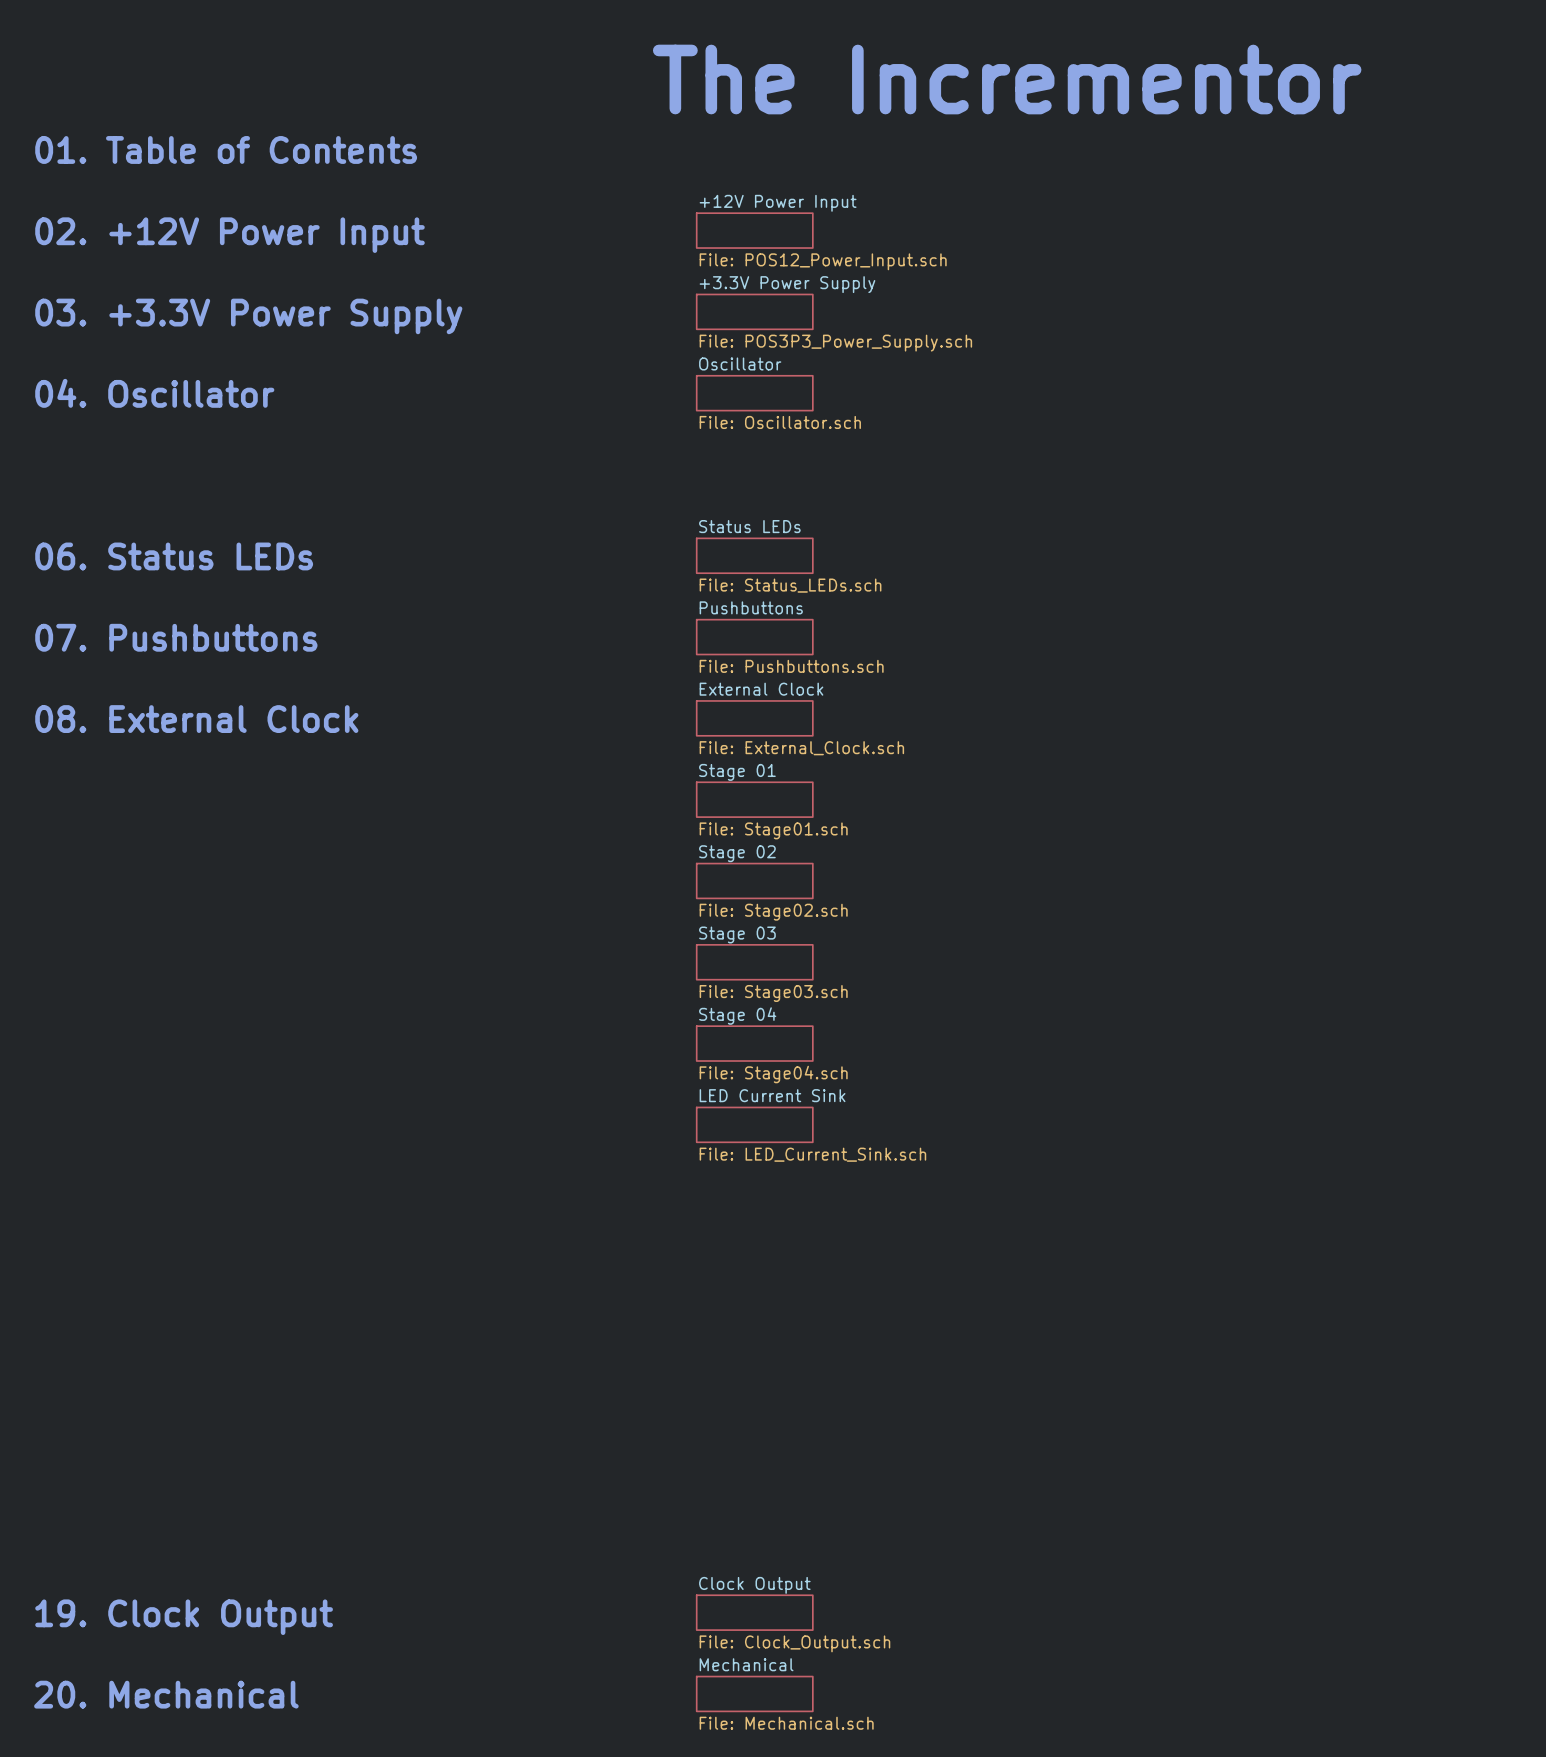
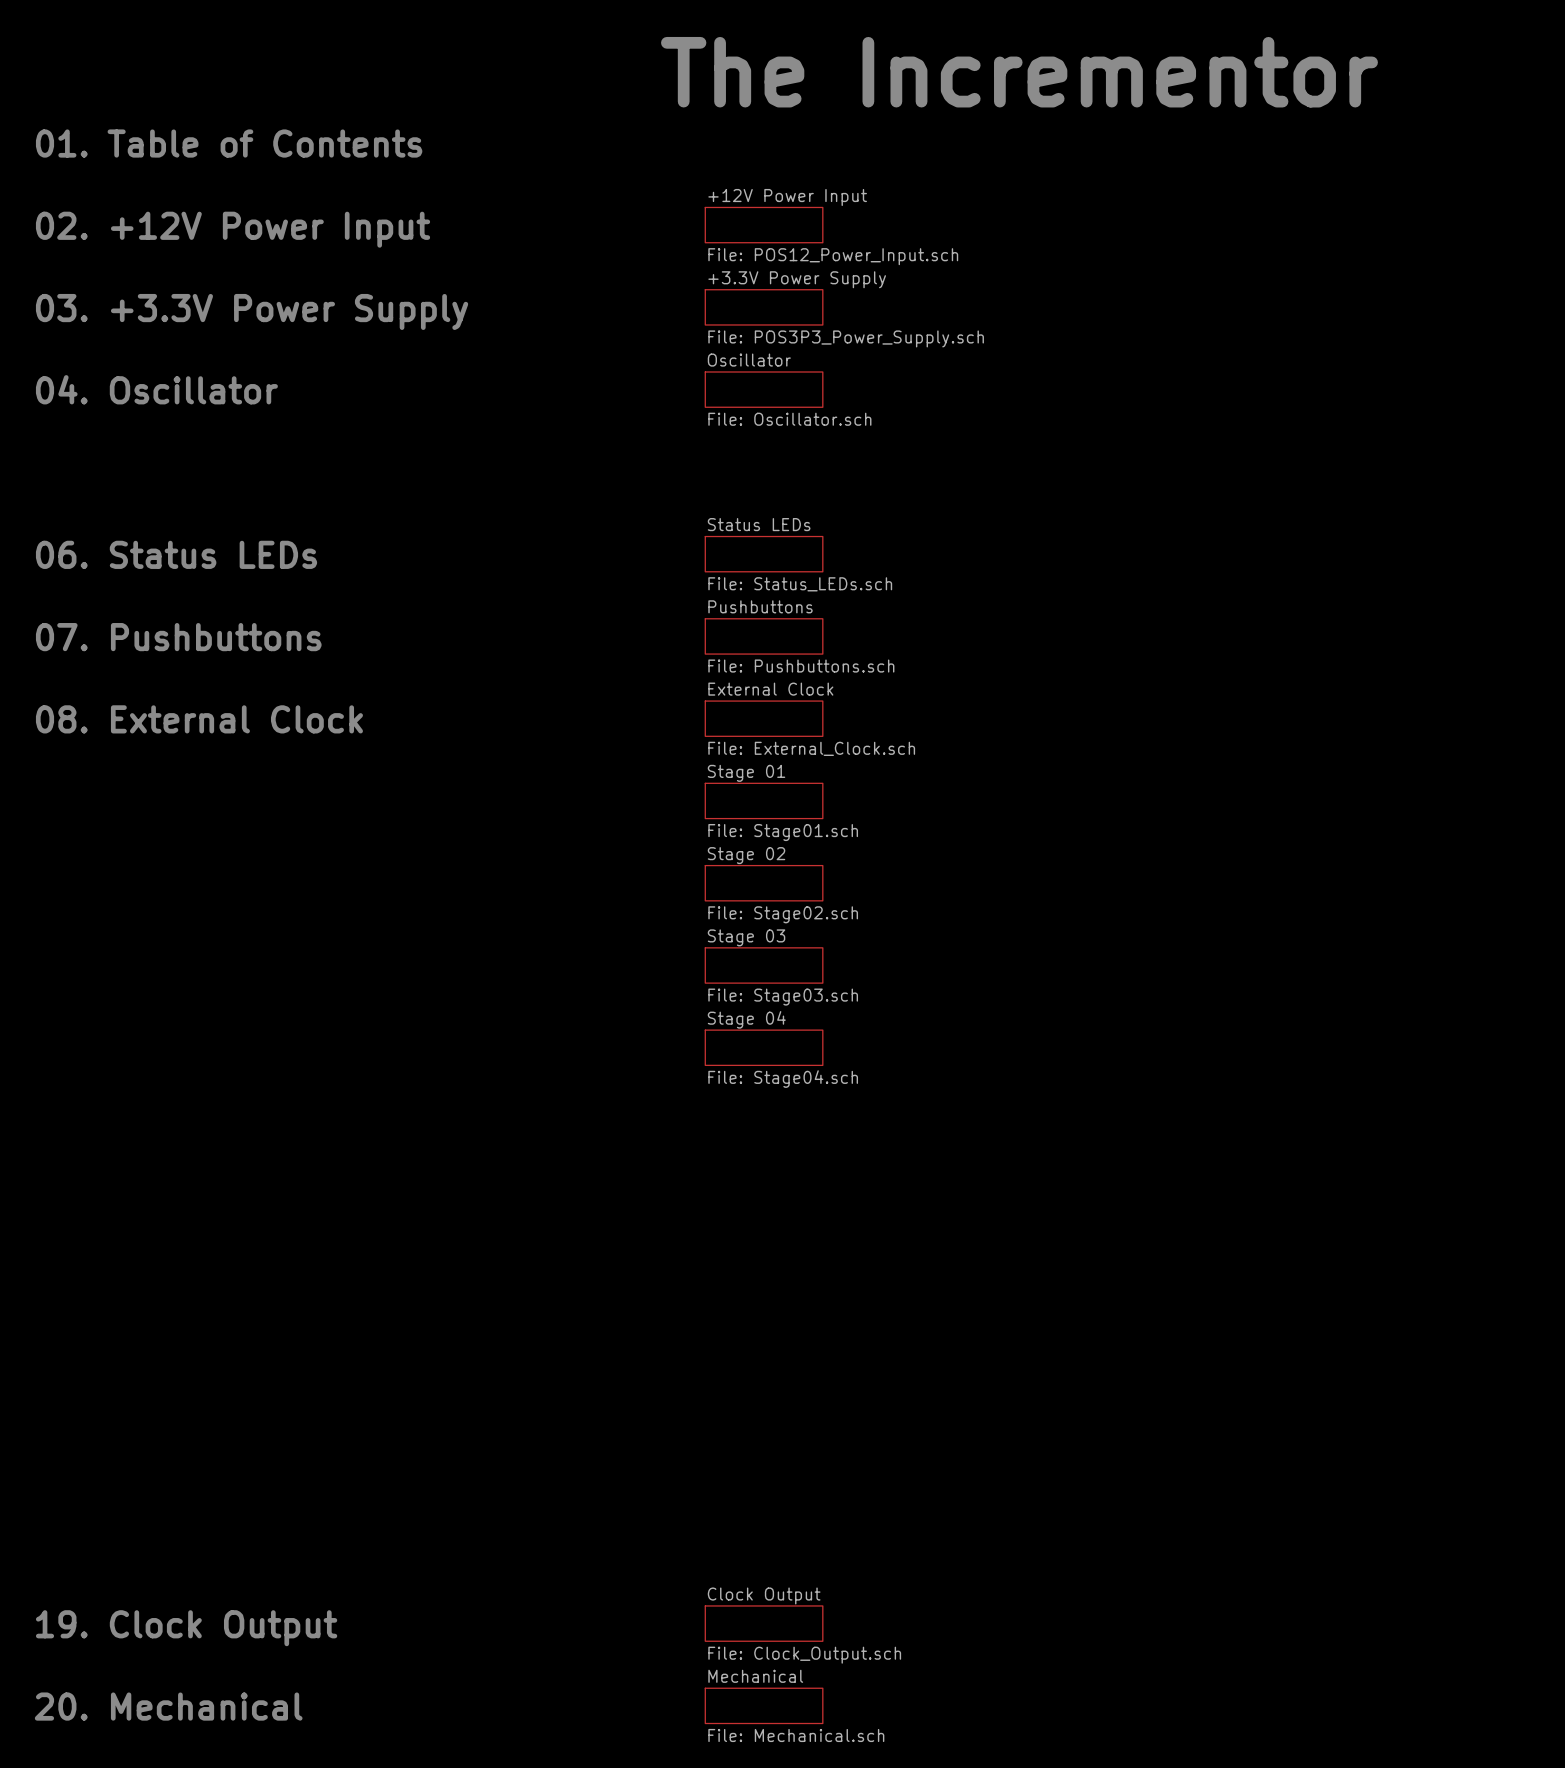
sheet LED Current Sink: File: LED_Current_Sink.sch (754, 1124) -> none

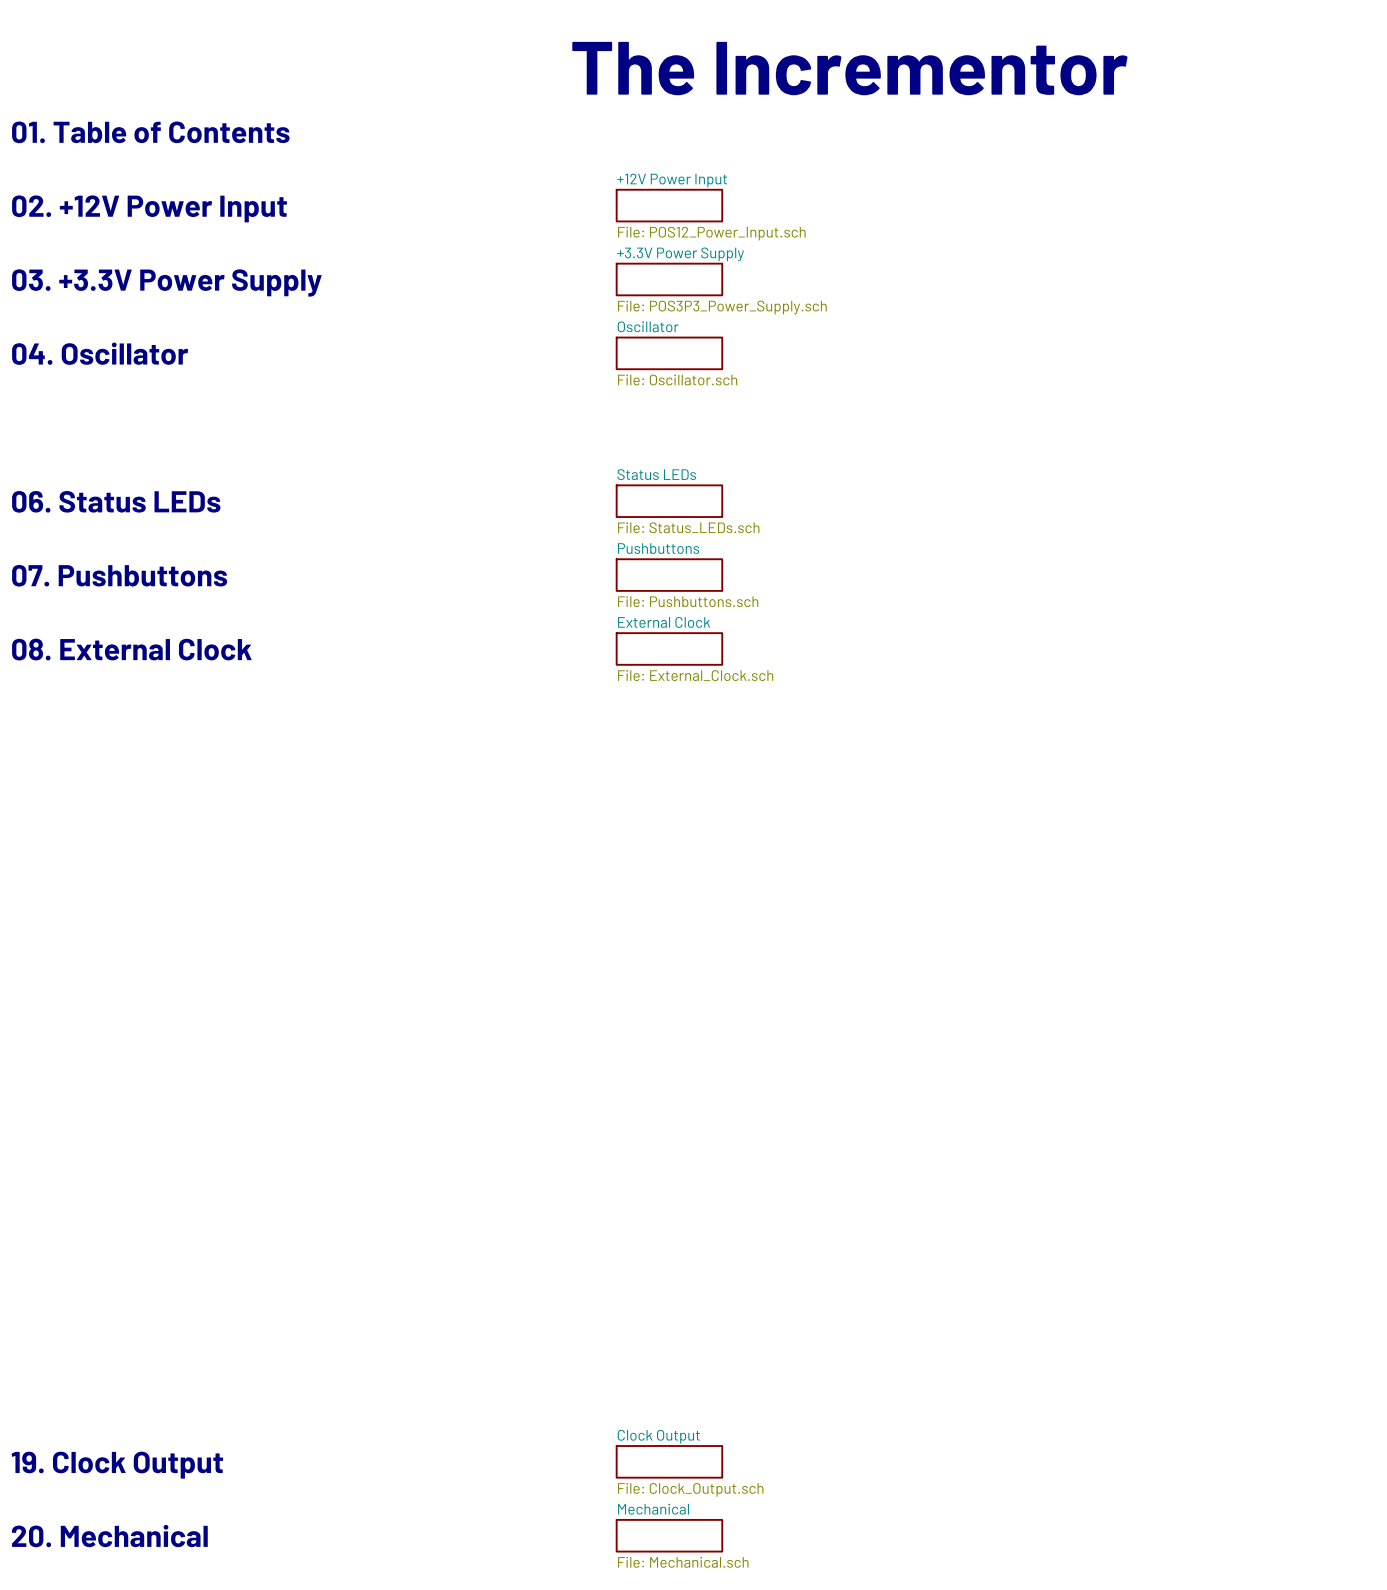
sheet Stage 01: File: Stage01.sch (764, 800) -> none
sheet Stage 02: File: Stage02.sch (764, 883) -> none
sheet Stage 03: File: Stage03.sch (764, 965) -> none
sheet Stage 04: File: Stage04.sch (764, 1047) -> none

